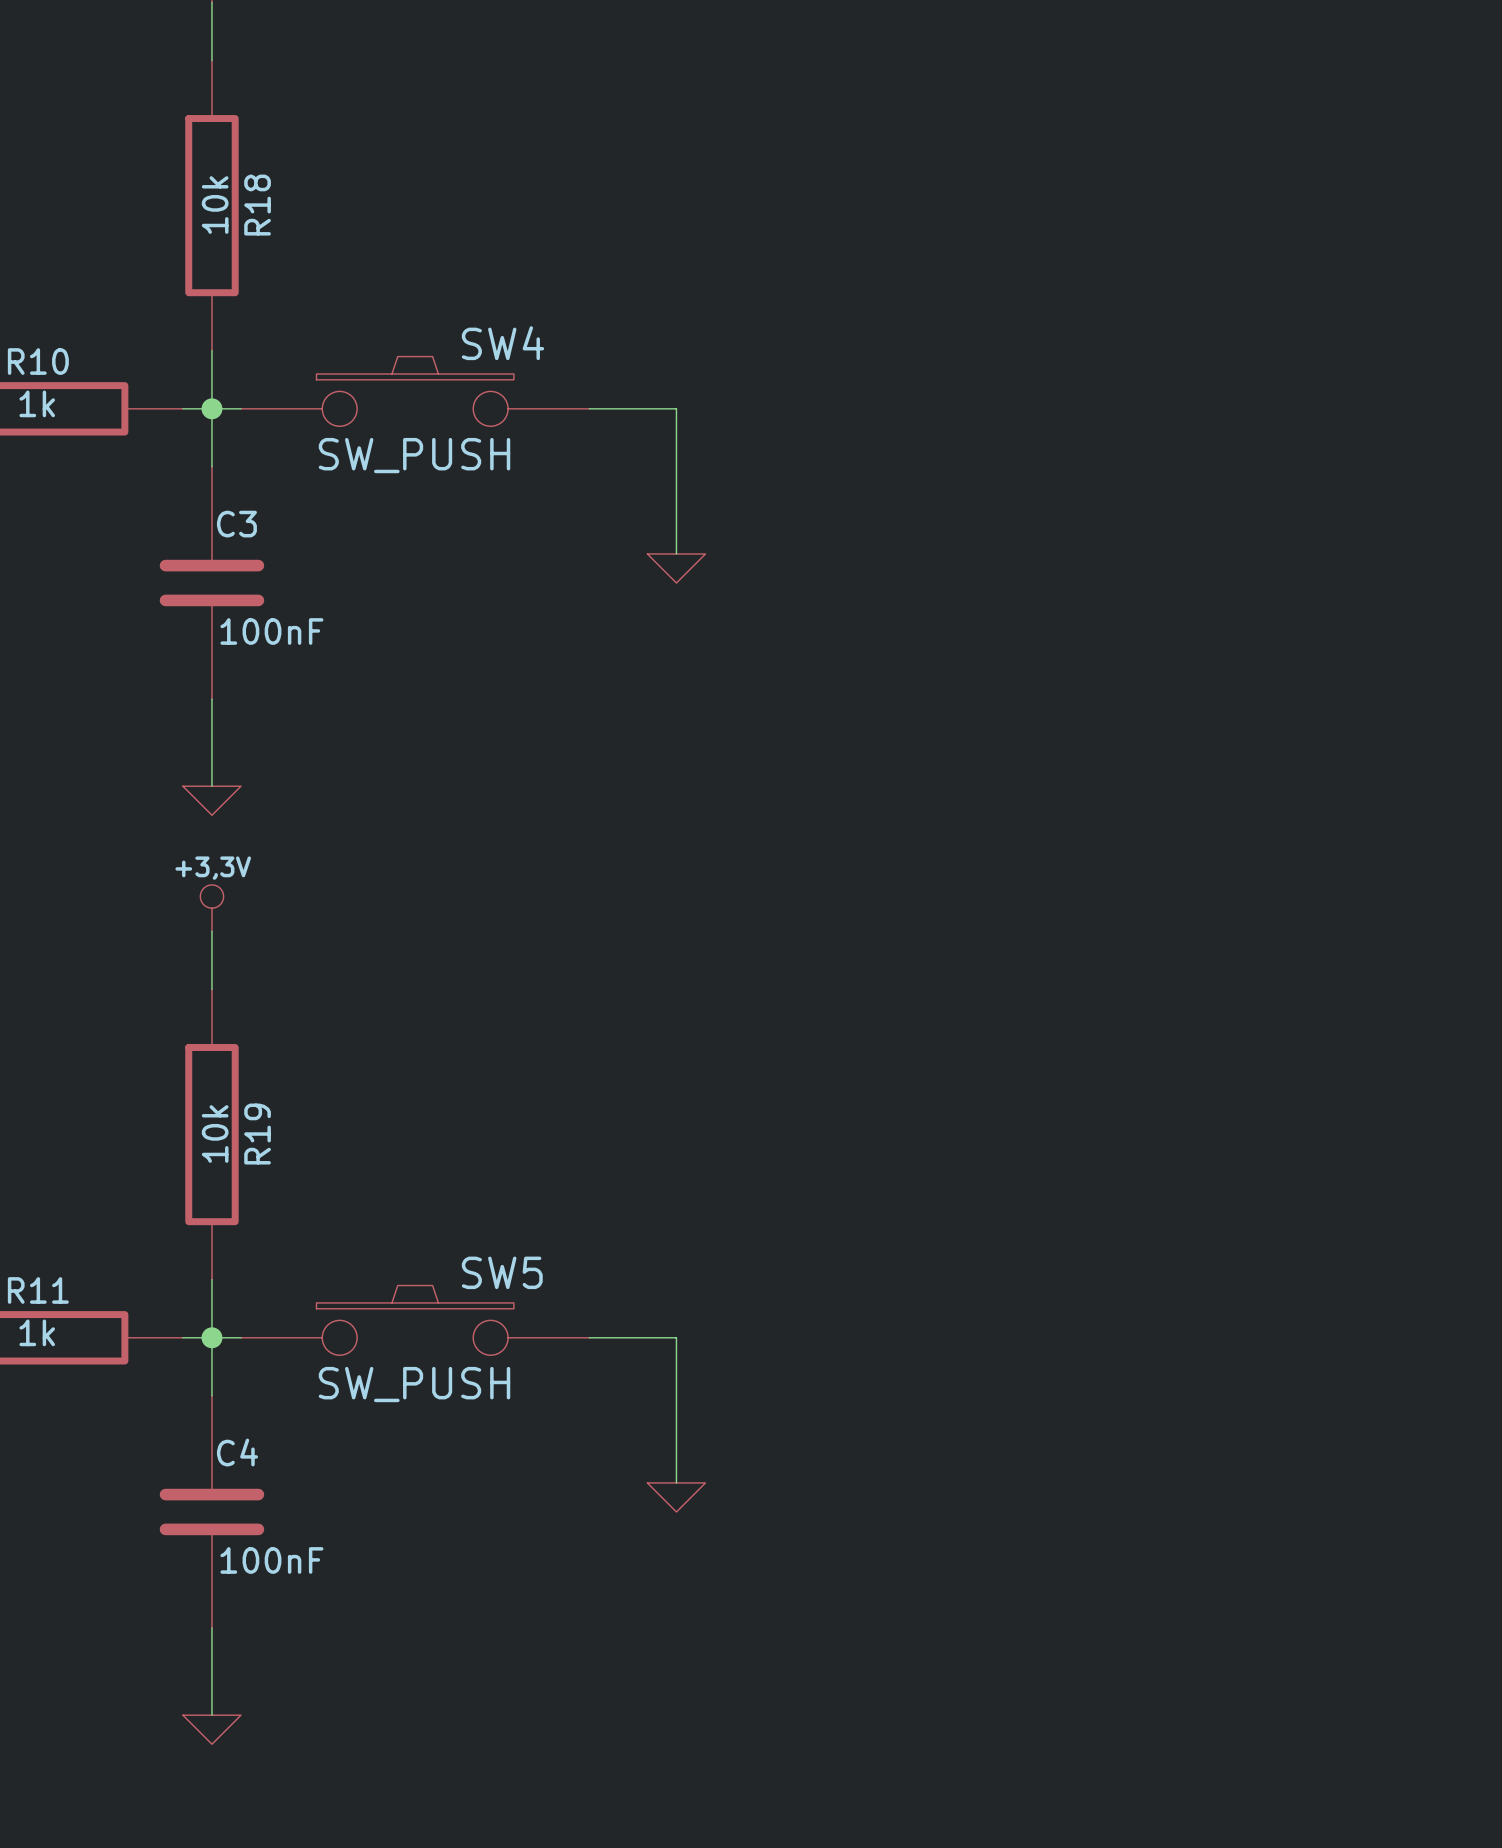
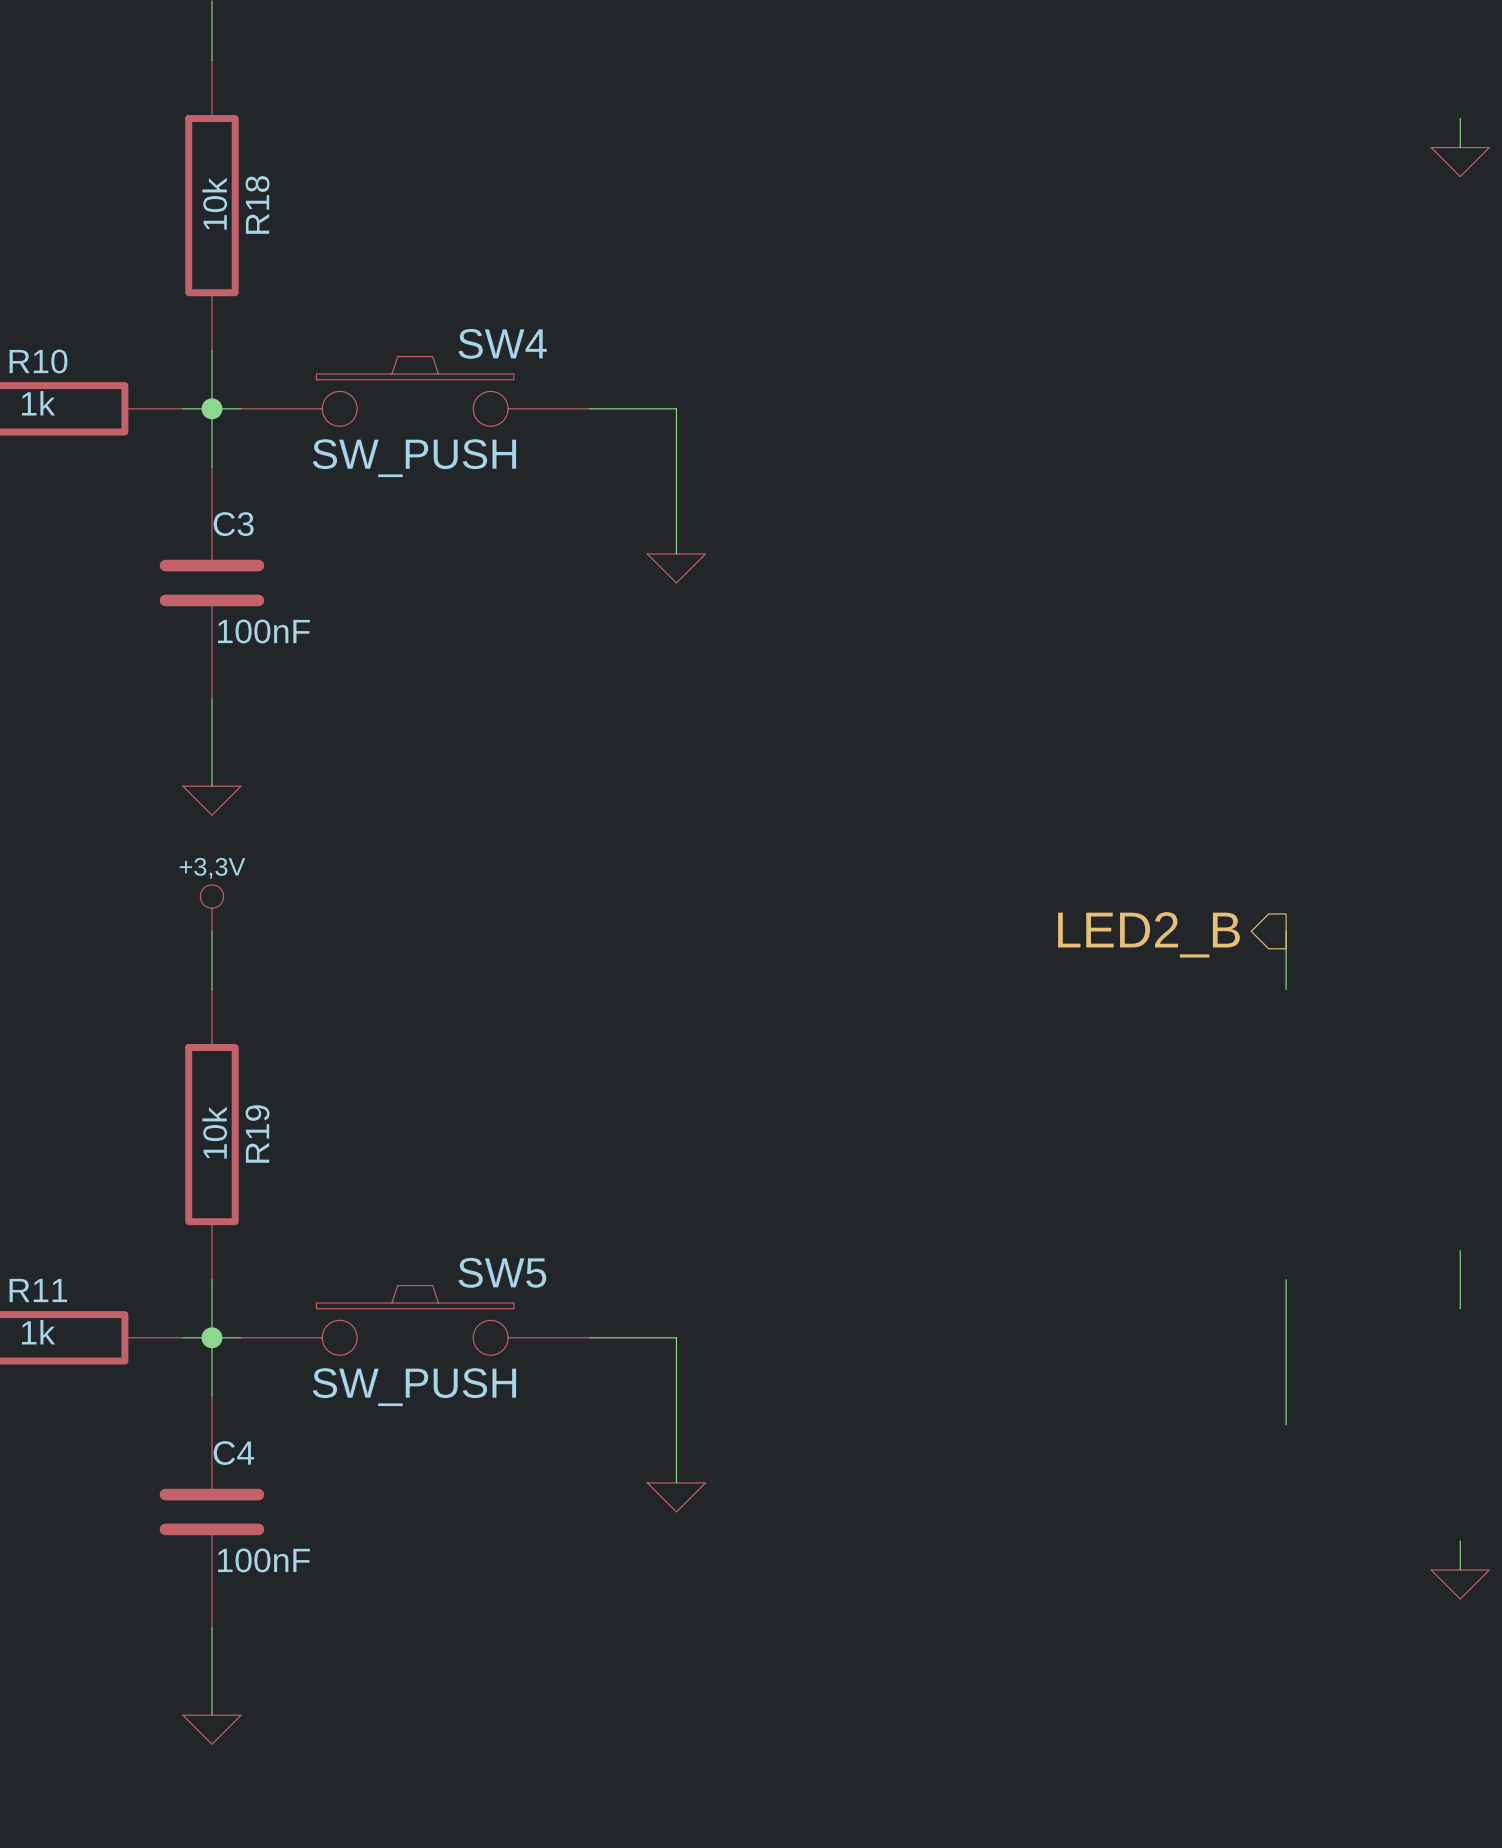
wire: none -> (1460, 118) (1460, 147)
power symbol: none -> (1460, 162)
hierarchical label: none -> LED2_B (1148, 934)
wire: none -> (1286, 931) (1286, 989)
wire: none -> (1460, 1250) (1460, 1308)
wire: none -> (1286, 1279) (1286, 1424)
wire: none -> (1460, 1541) (1460, 1570)
power symbol: none -> (1460, 1584)

